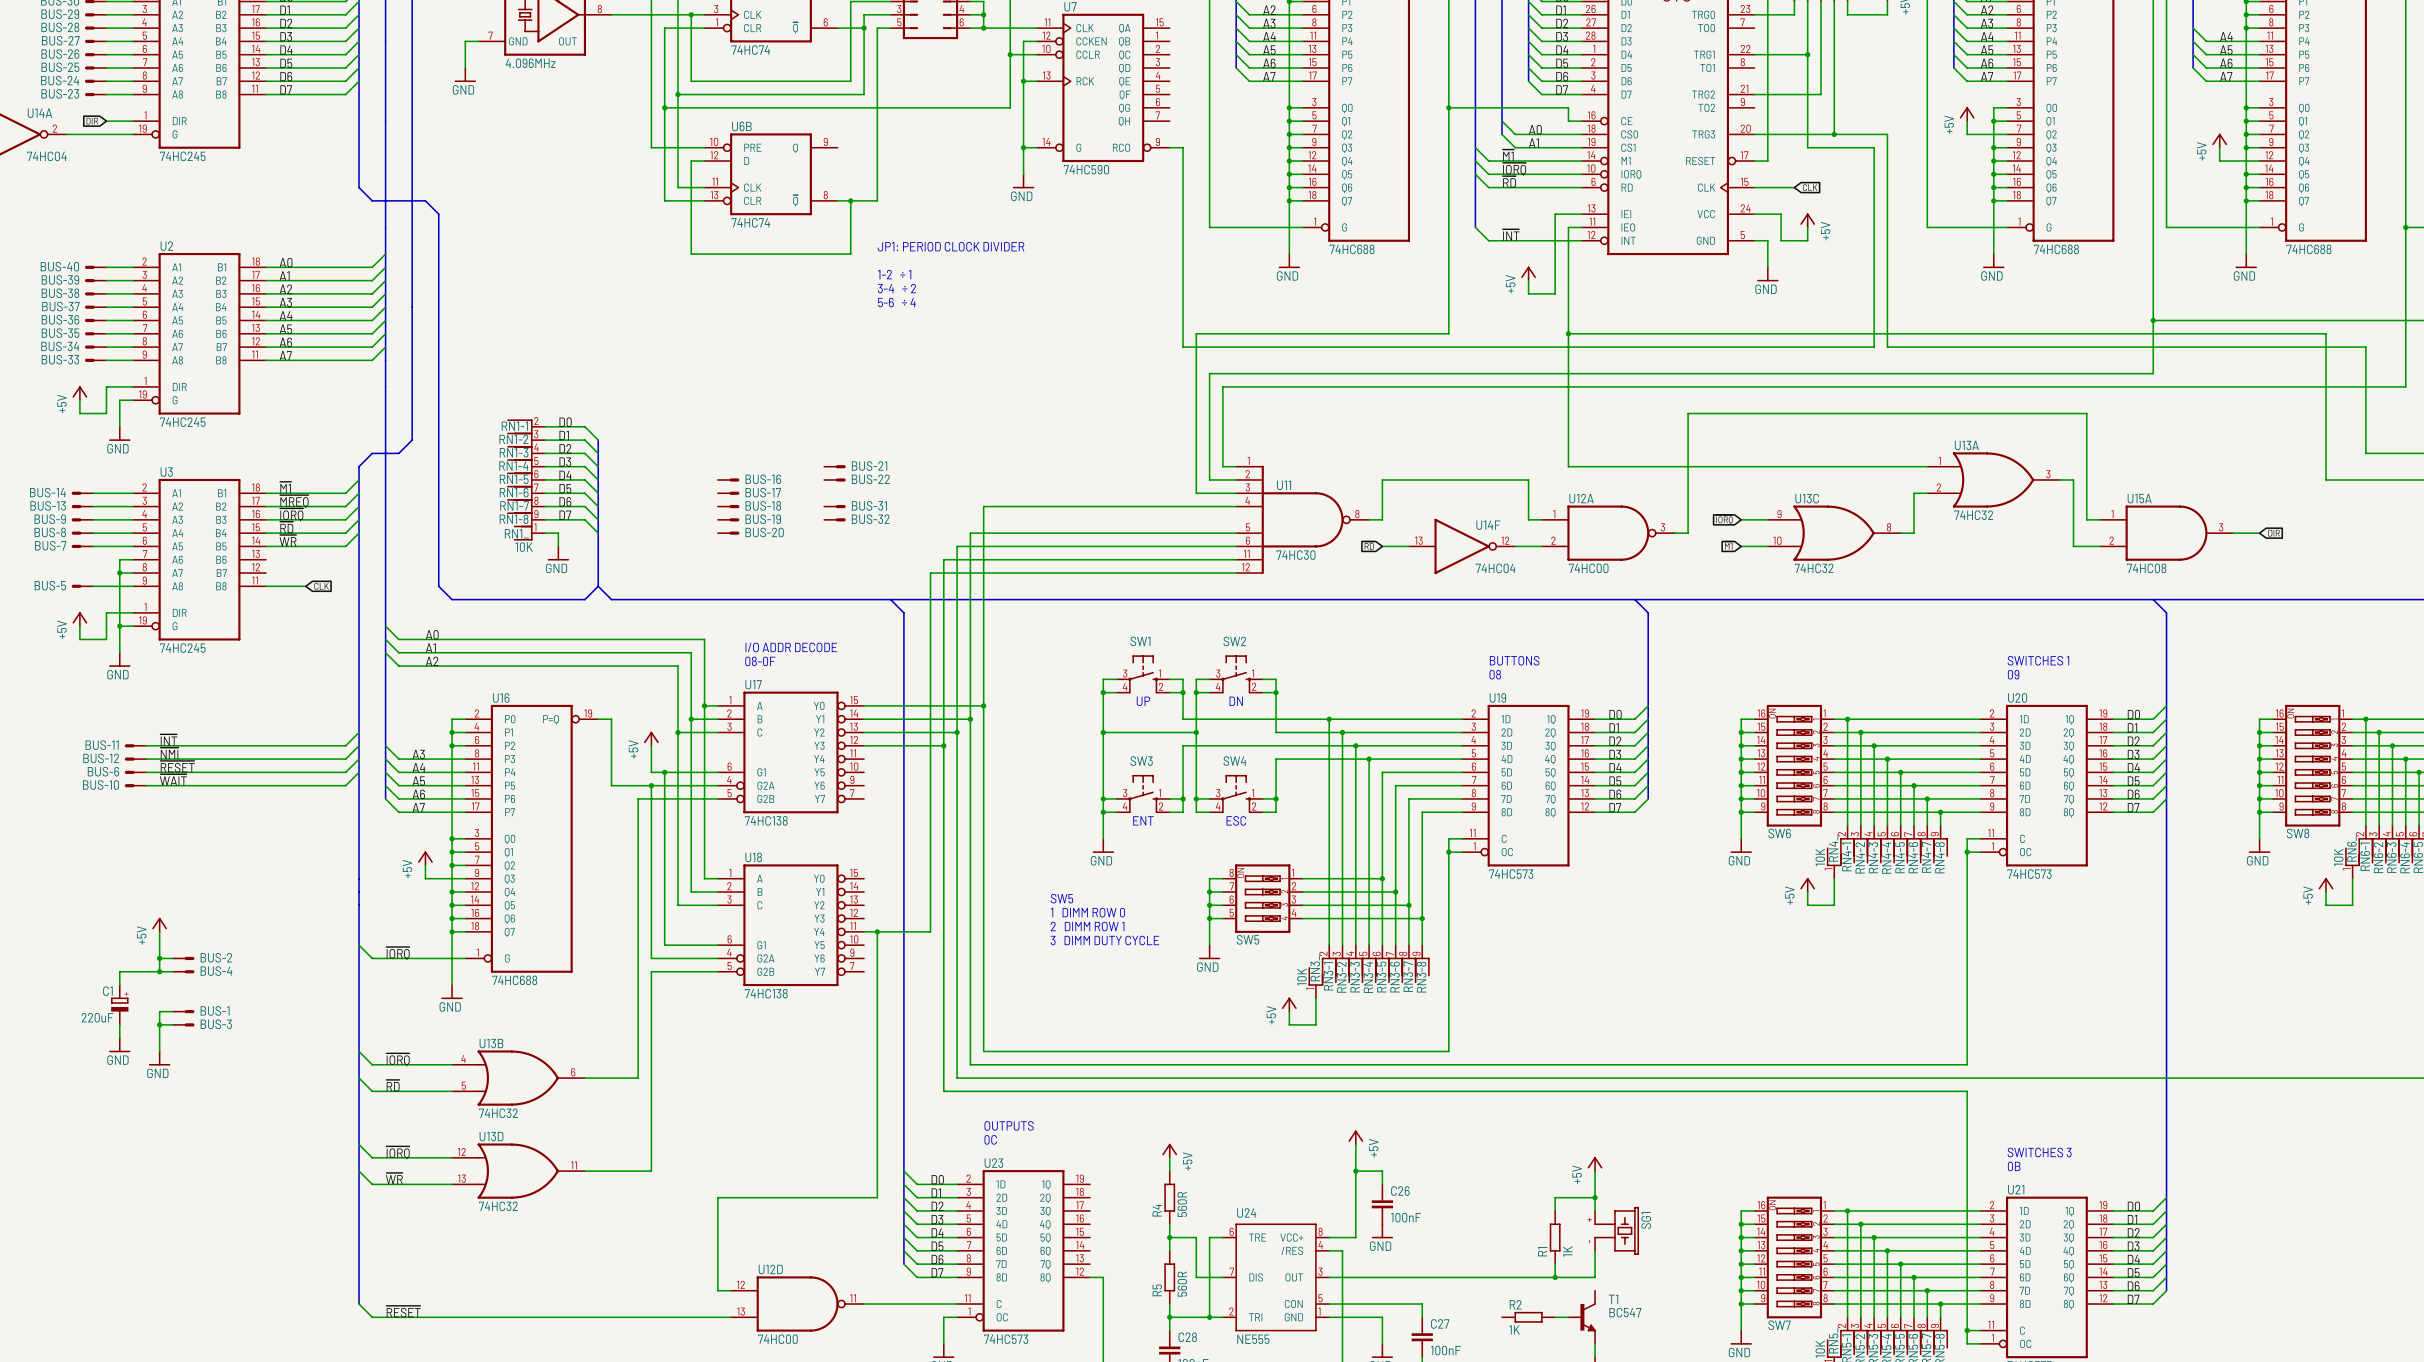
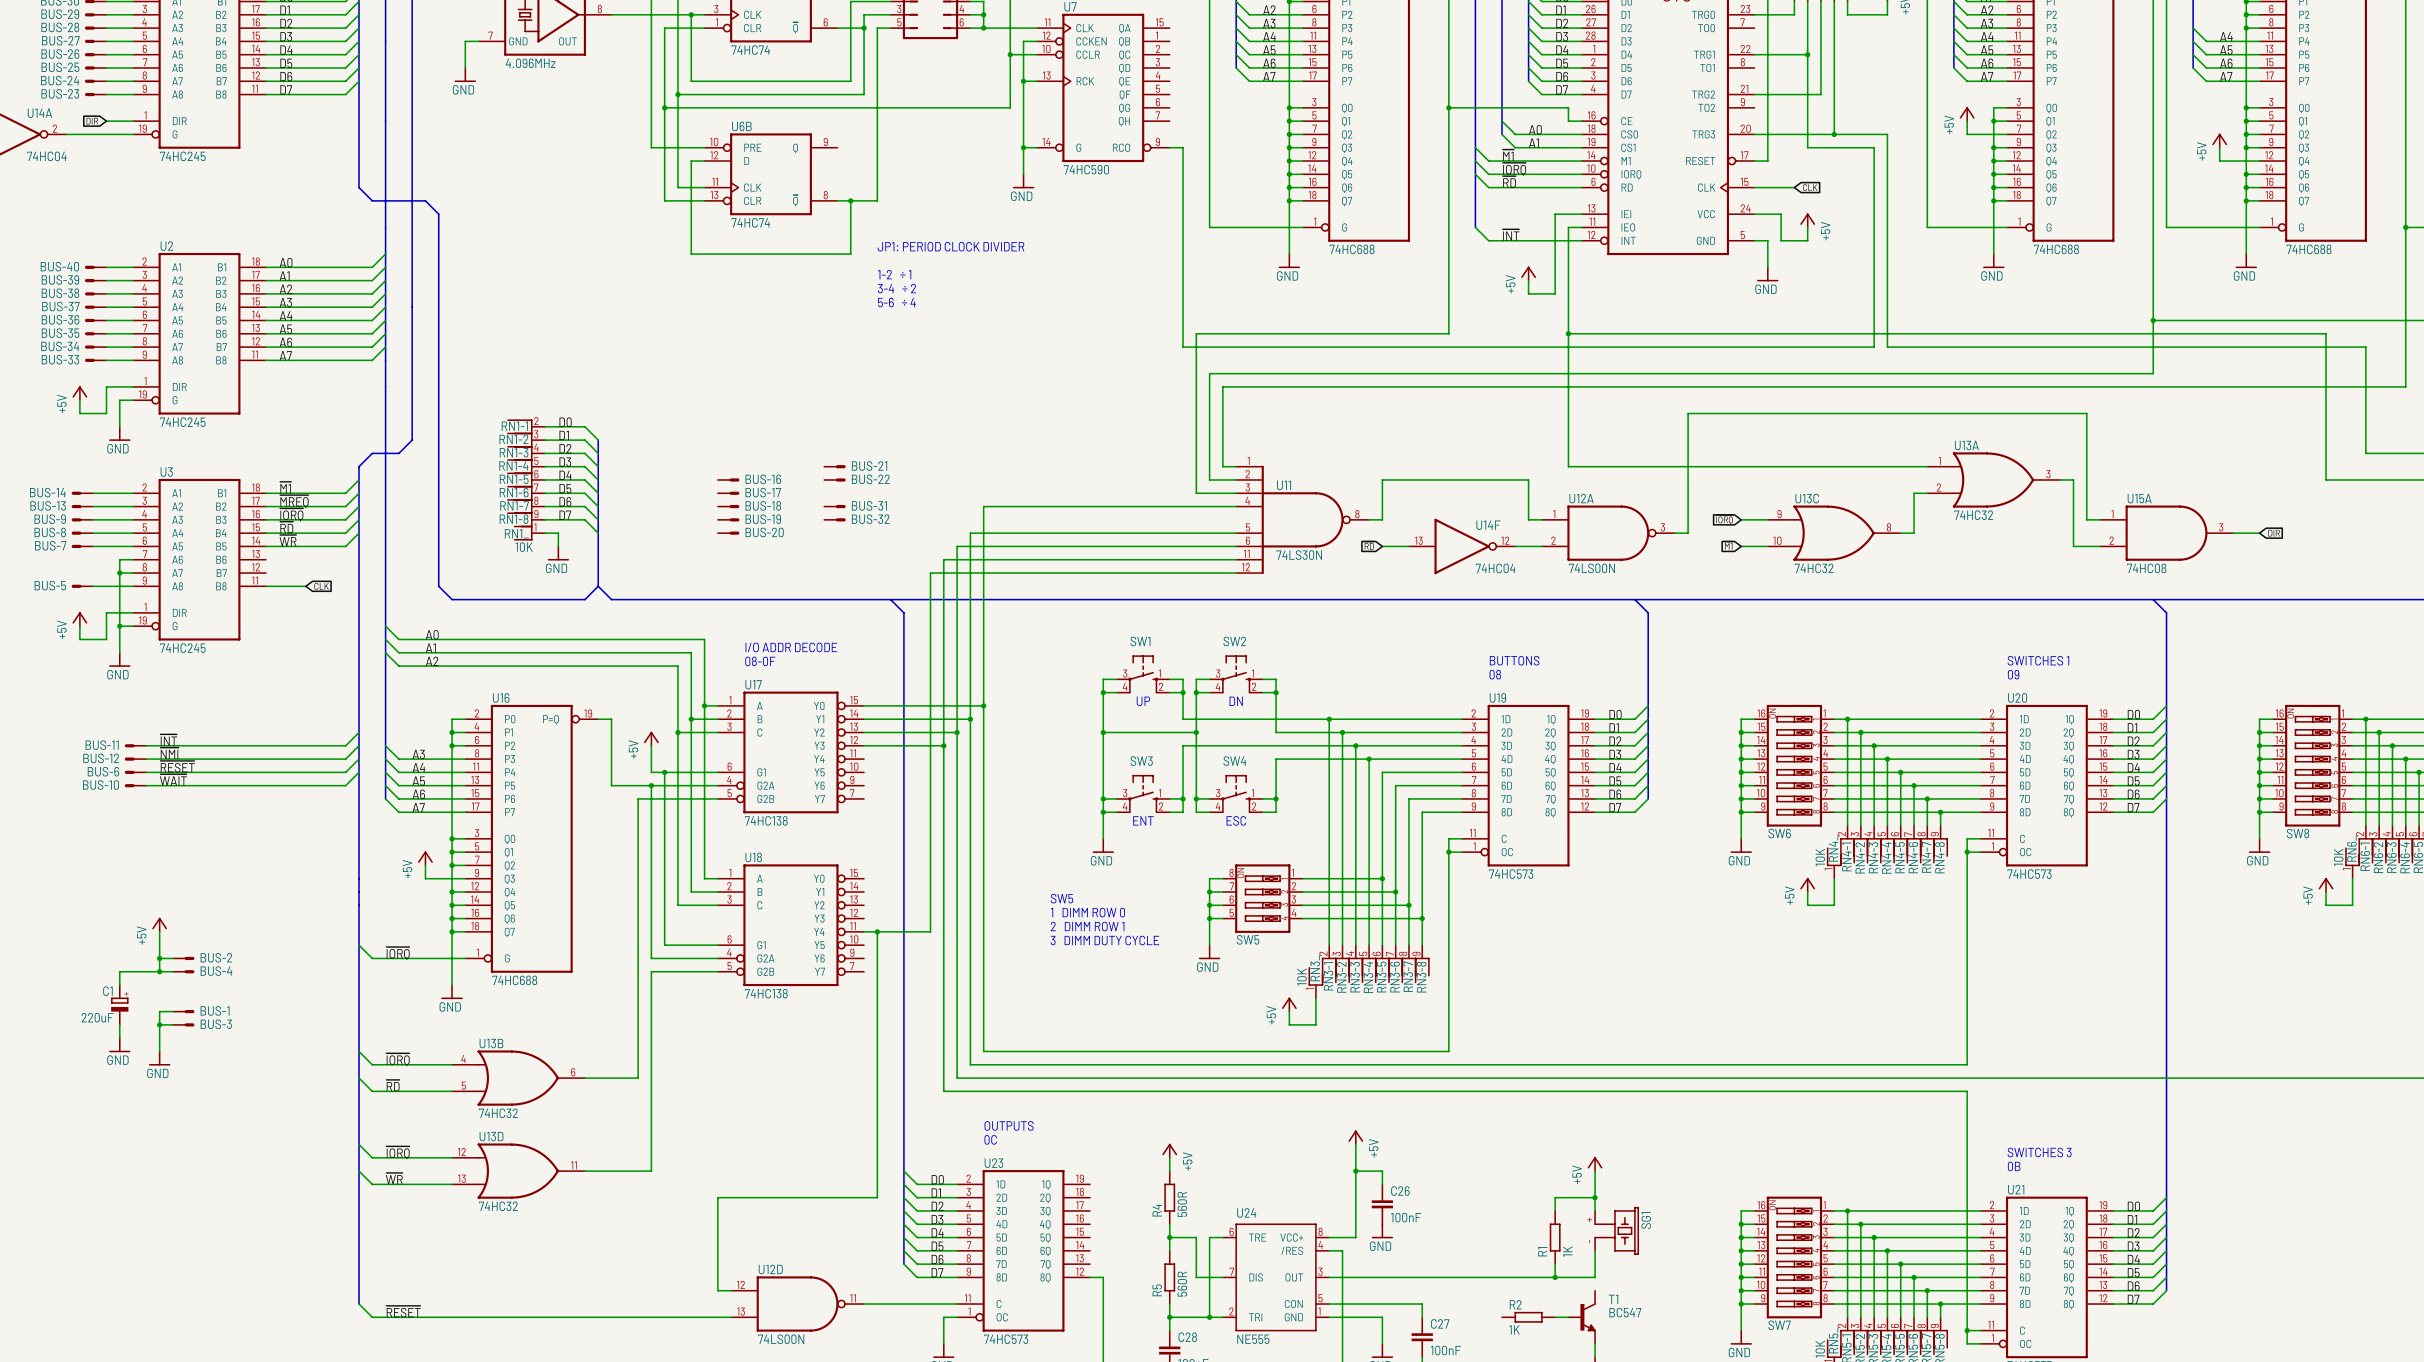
U11 value: 74HC30 (1295, 555) -> 74LS30N (1299, 555)
U12A value: 74HC00 (1588, 568) -> 74LS00N (1591, 568)
U12D value: 74HC00 (777, 1339) -> 74LS00N (781, 1339)

